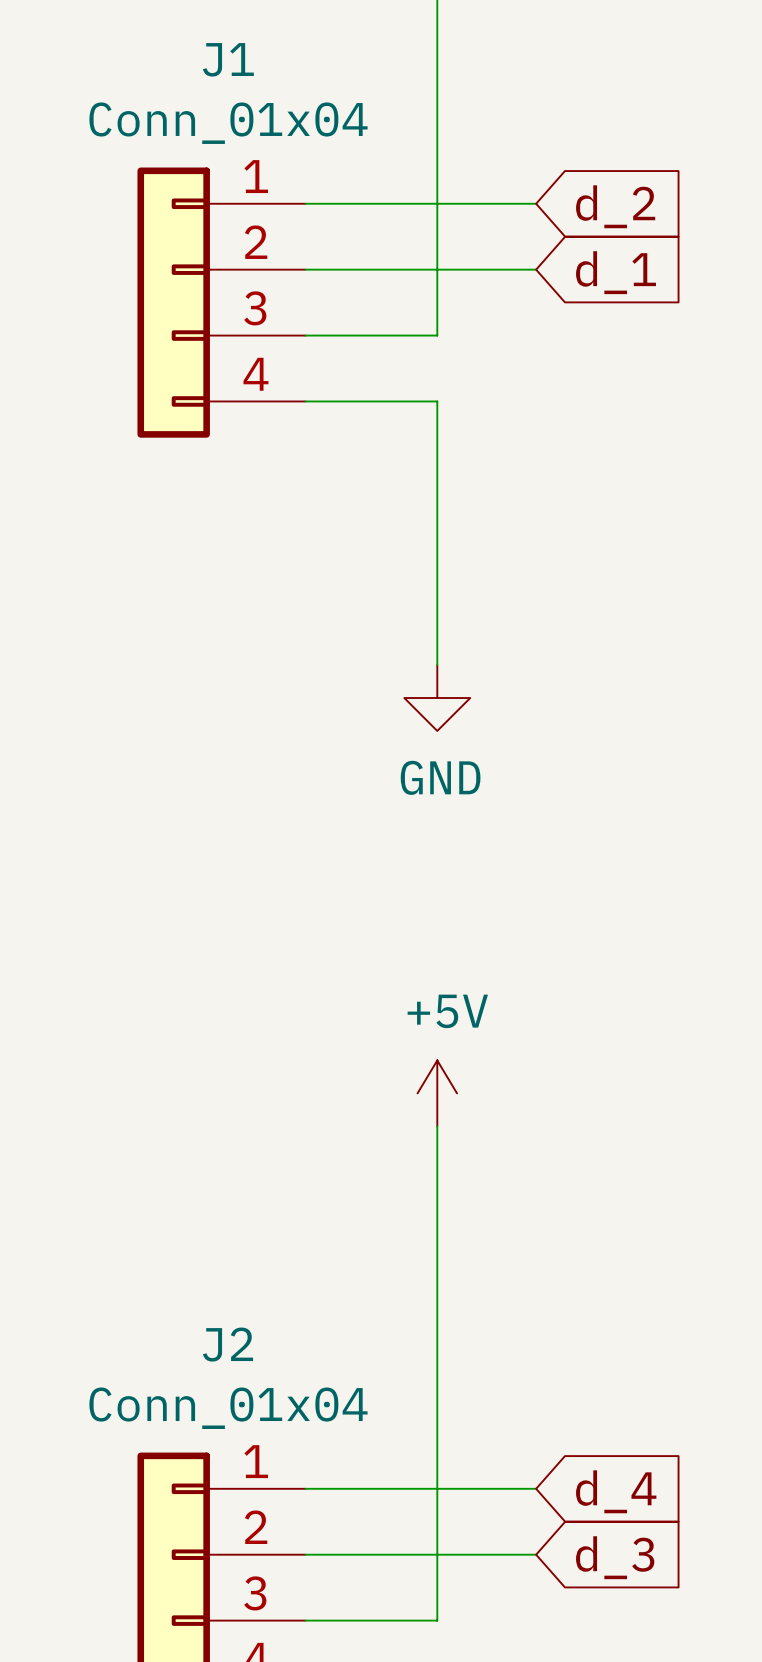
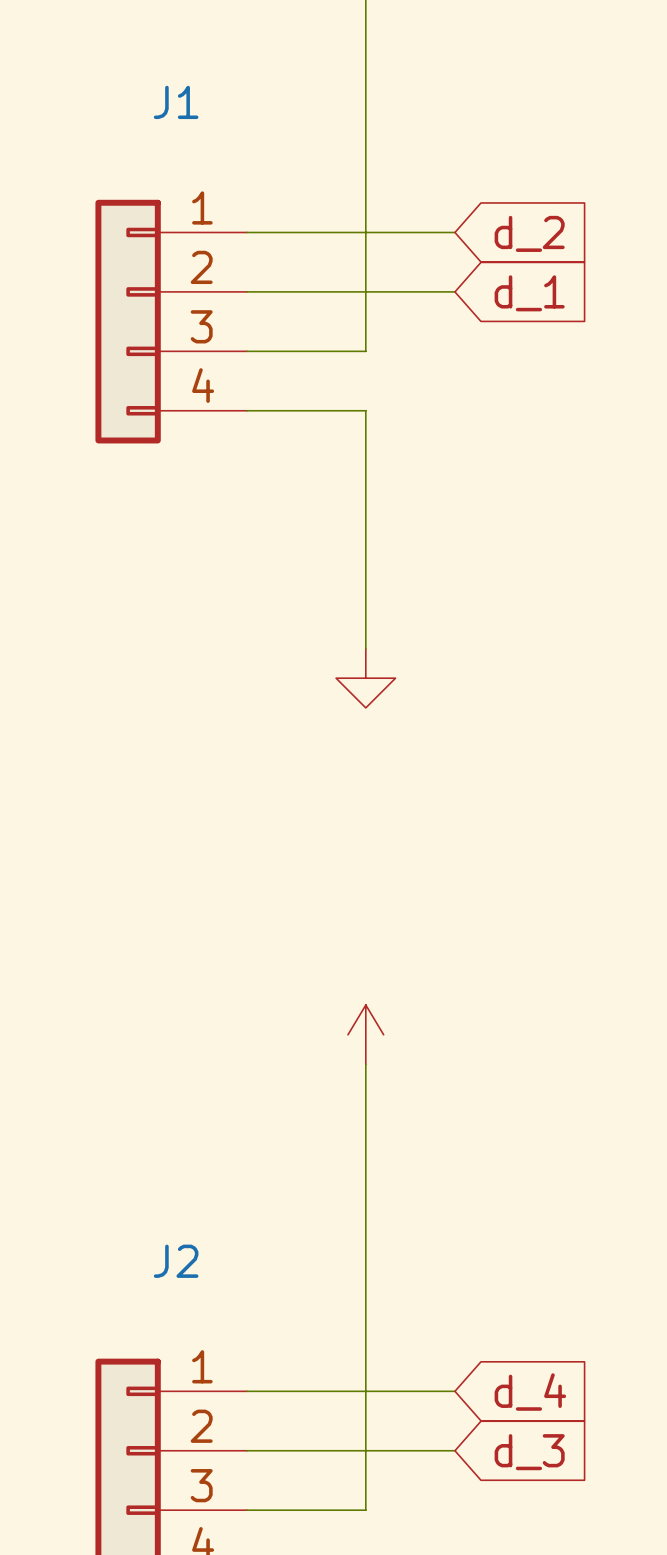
J1 value: Conn_01x04 (228, 123) -> none
power symbol text: GND (440, 777) -> none
power symbol text: +5V (447, 1011) -> none
J2 value: Conn_01x04 (228, 1408) -> none

